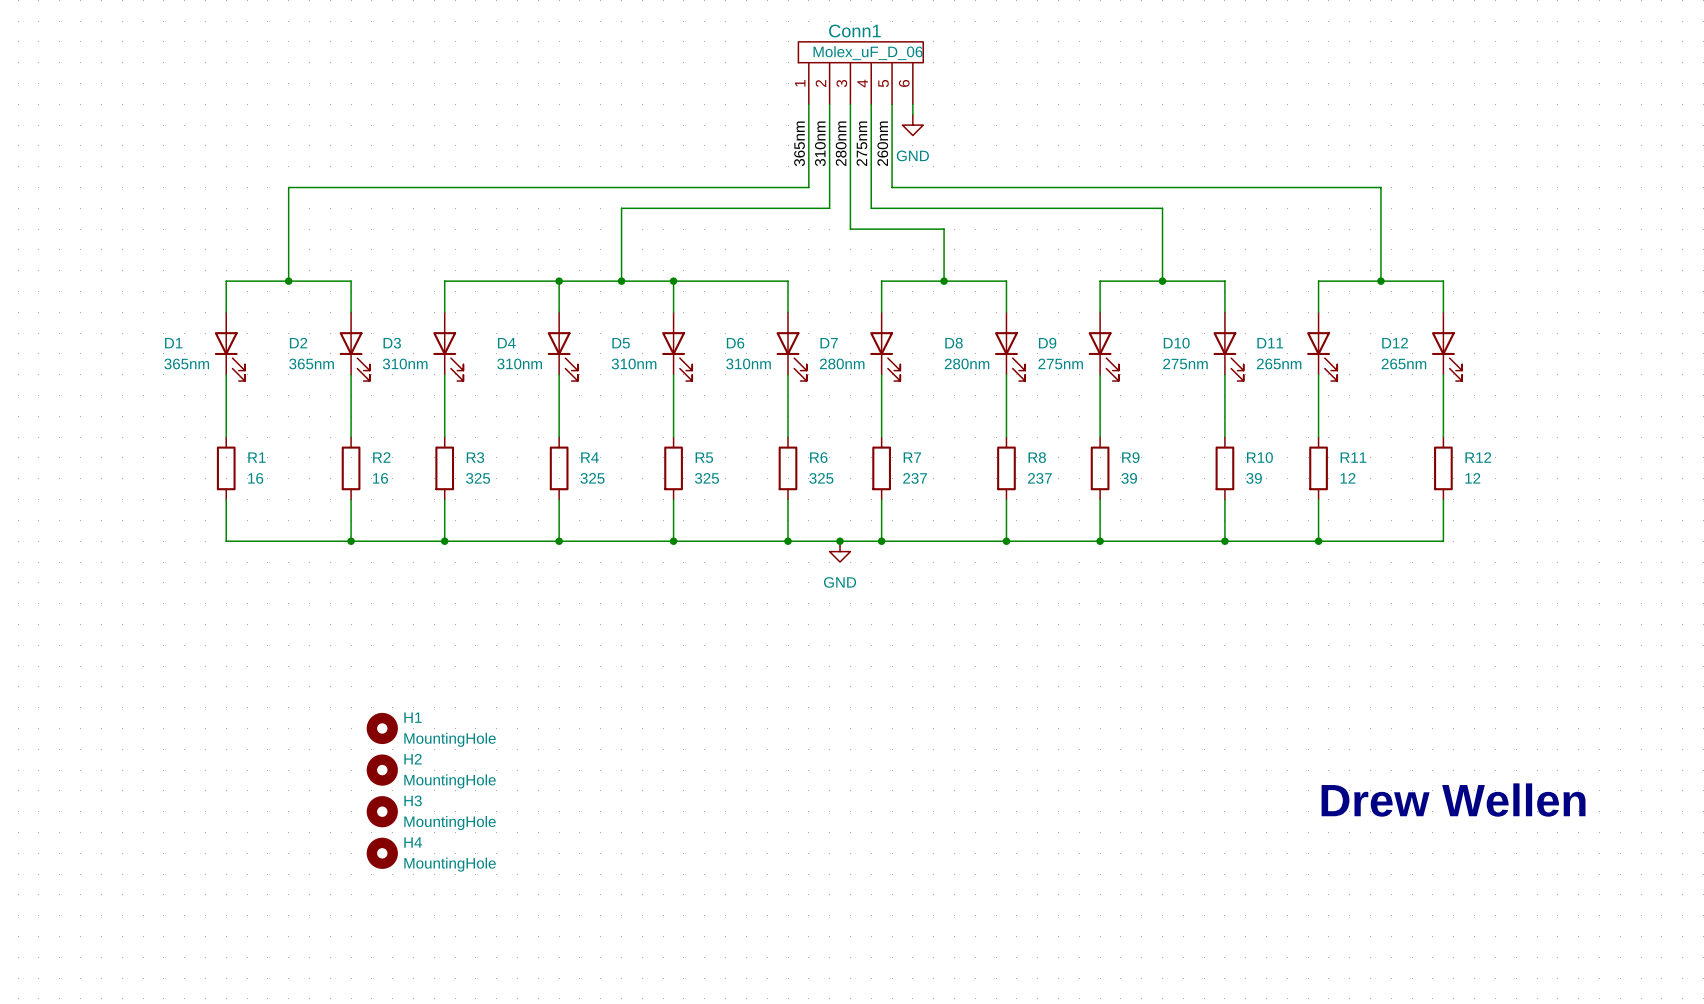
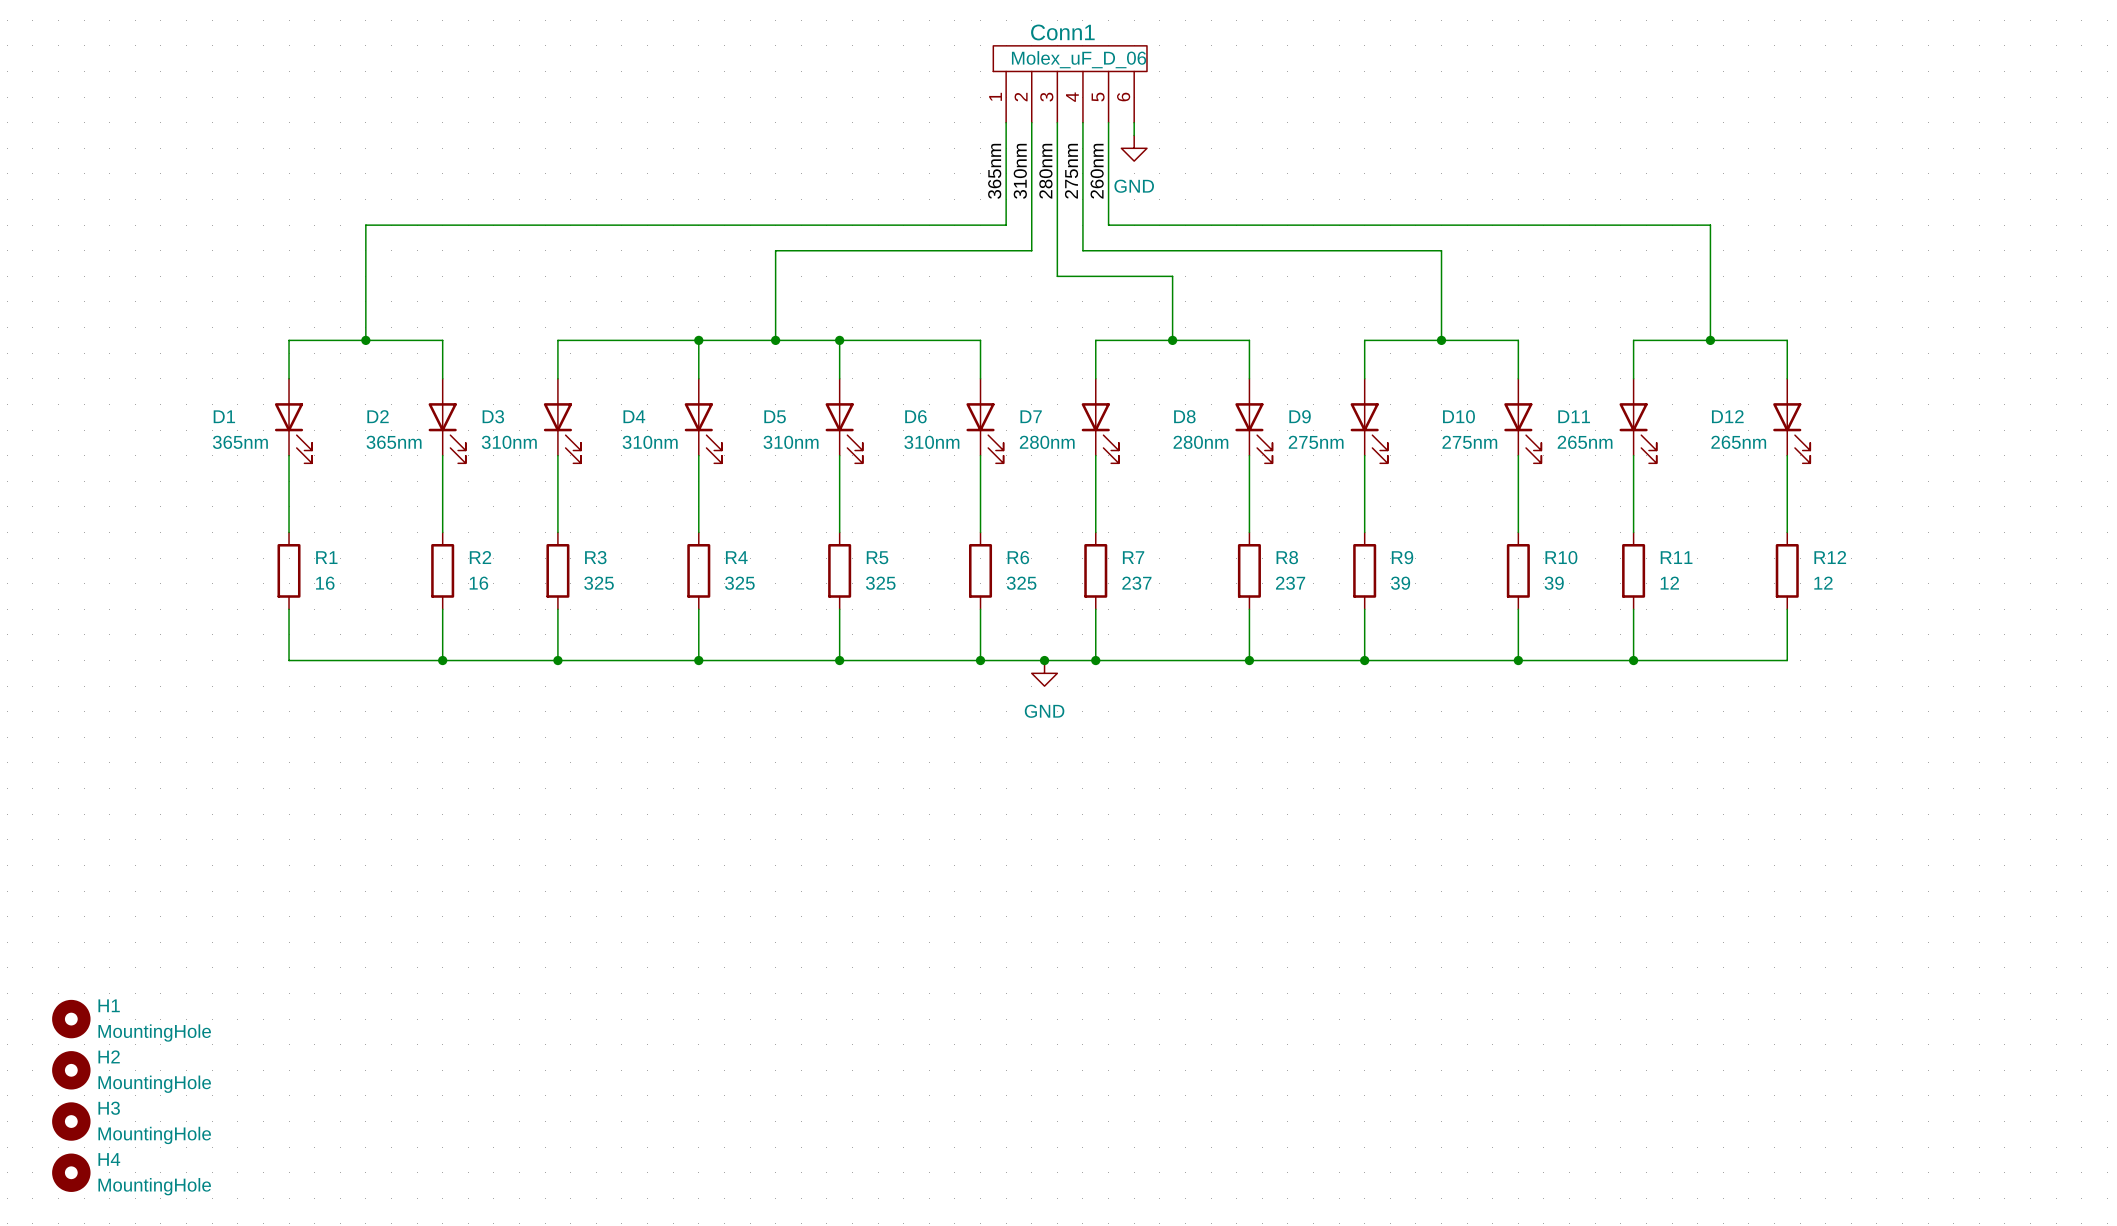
H1 position: (382, 728) -> (71, 1019)
H2 position: (382, 770) -> (71, 1070)
text: Drew Wellen (1453, 800) -> none
H3 position: (382, 811) -> (71, 1121)
H4 position: (382, 853) -> (71, 1172)

